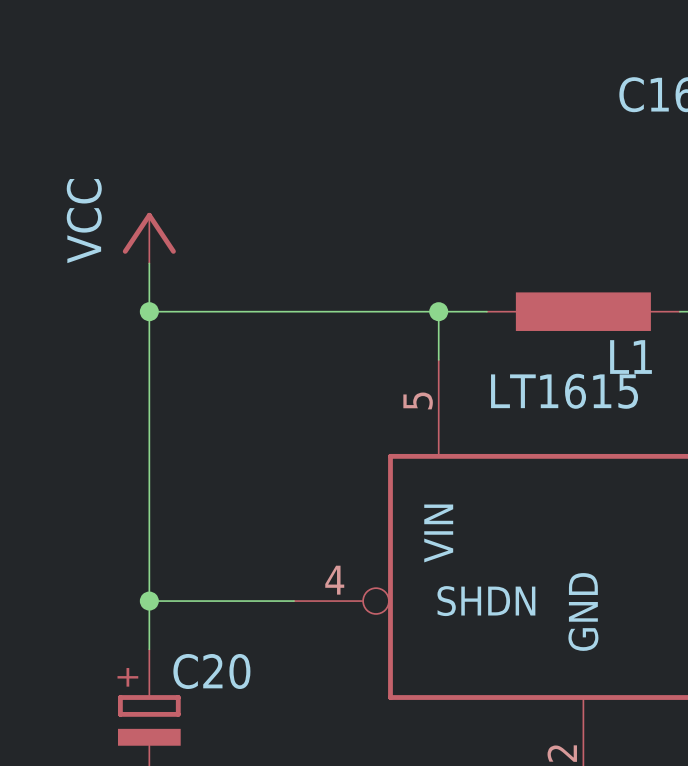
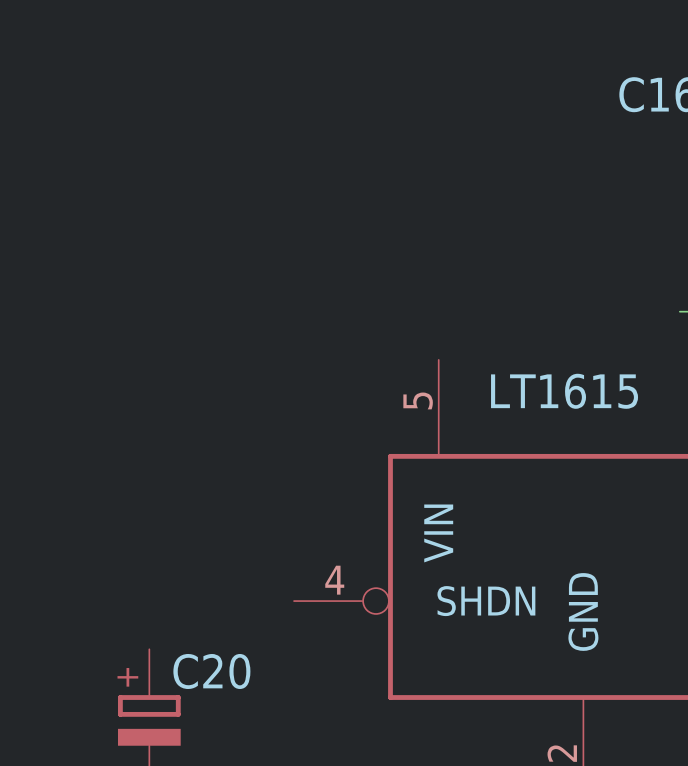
power symbol: VCC (149, 238) -> none
wire: (149, 263) (149, 649) -> none
wire: (149, 311) (486, 311) -> none
junction: (149, 311) -> none
wire: (438, 311) (438, 359) -> none
junction: (438, 311) -> none
L1: (583, 311) -> none
wire: (149, 601) (294, 601) -> none
junction: (149, 601) -> none

